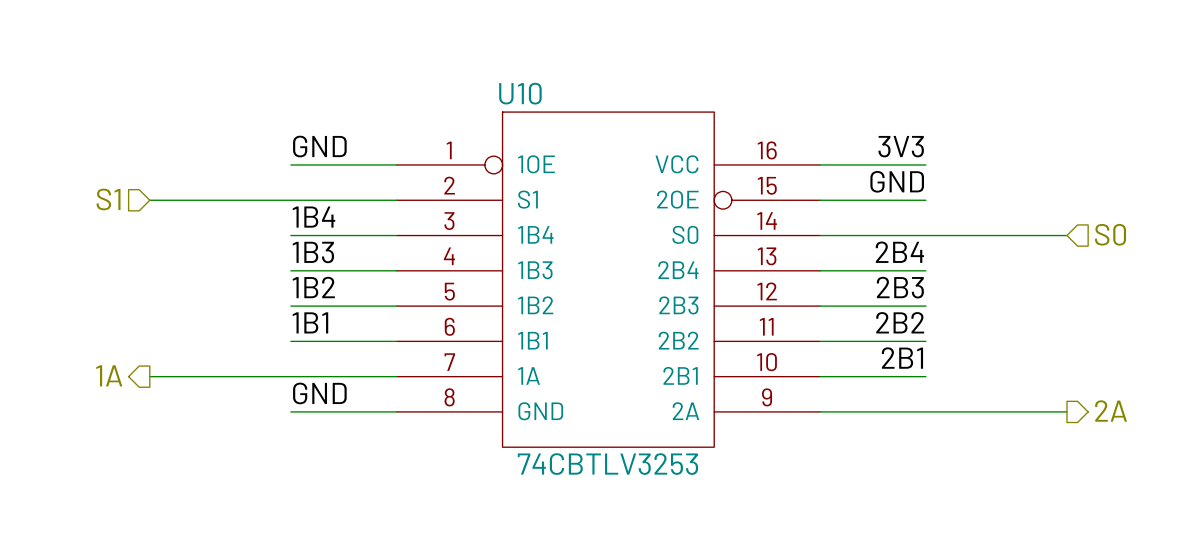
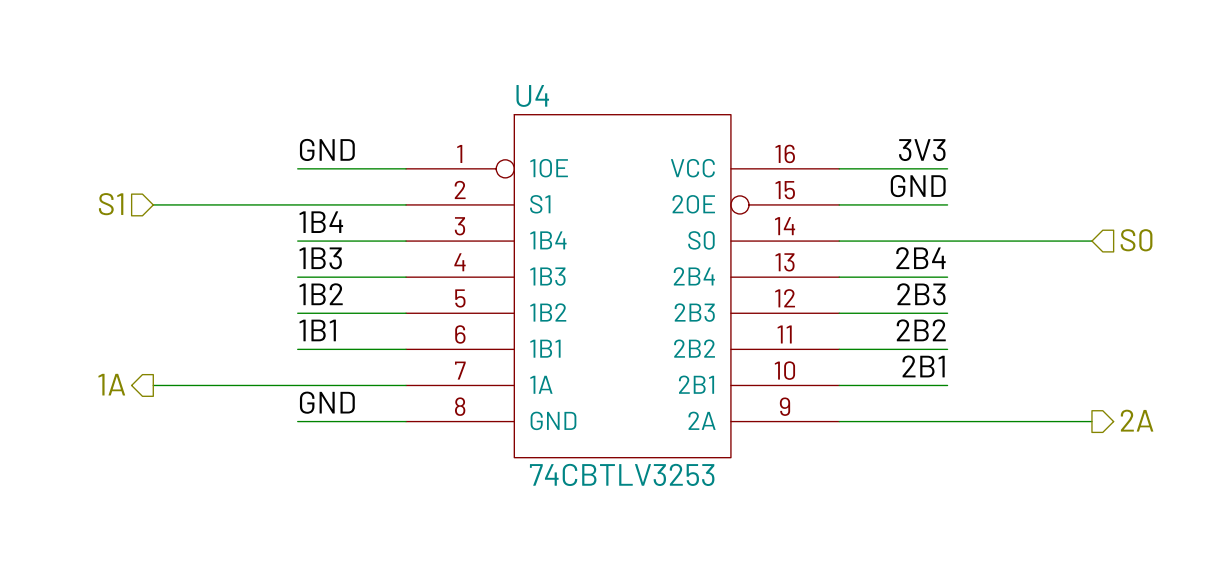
U10 name: U10 (520, 93) -> U4 (532, 95)

